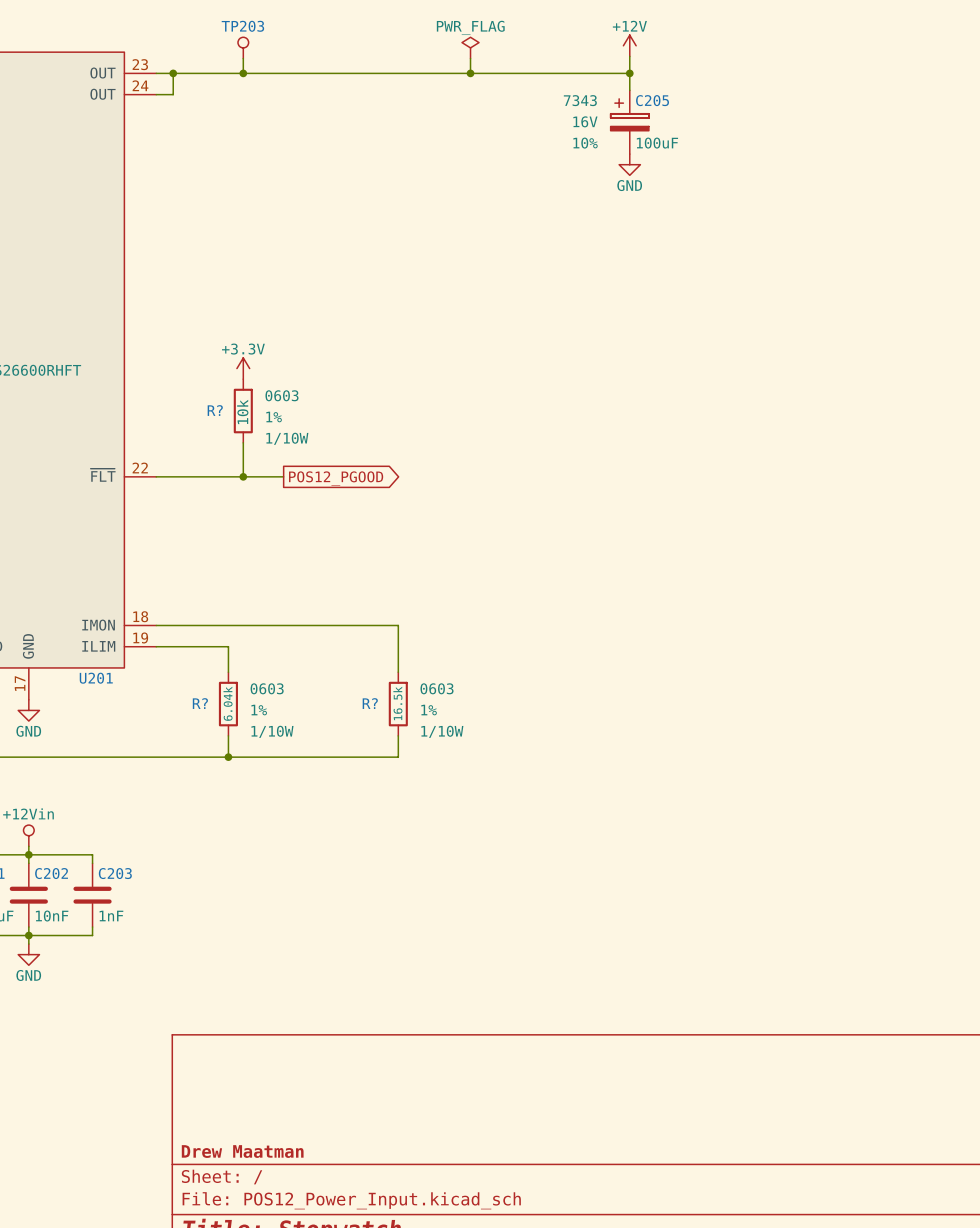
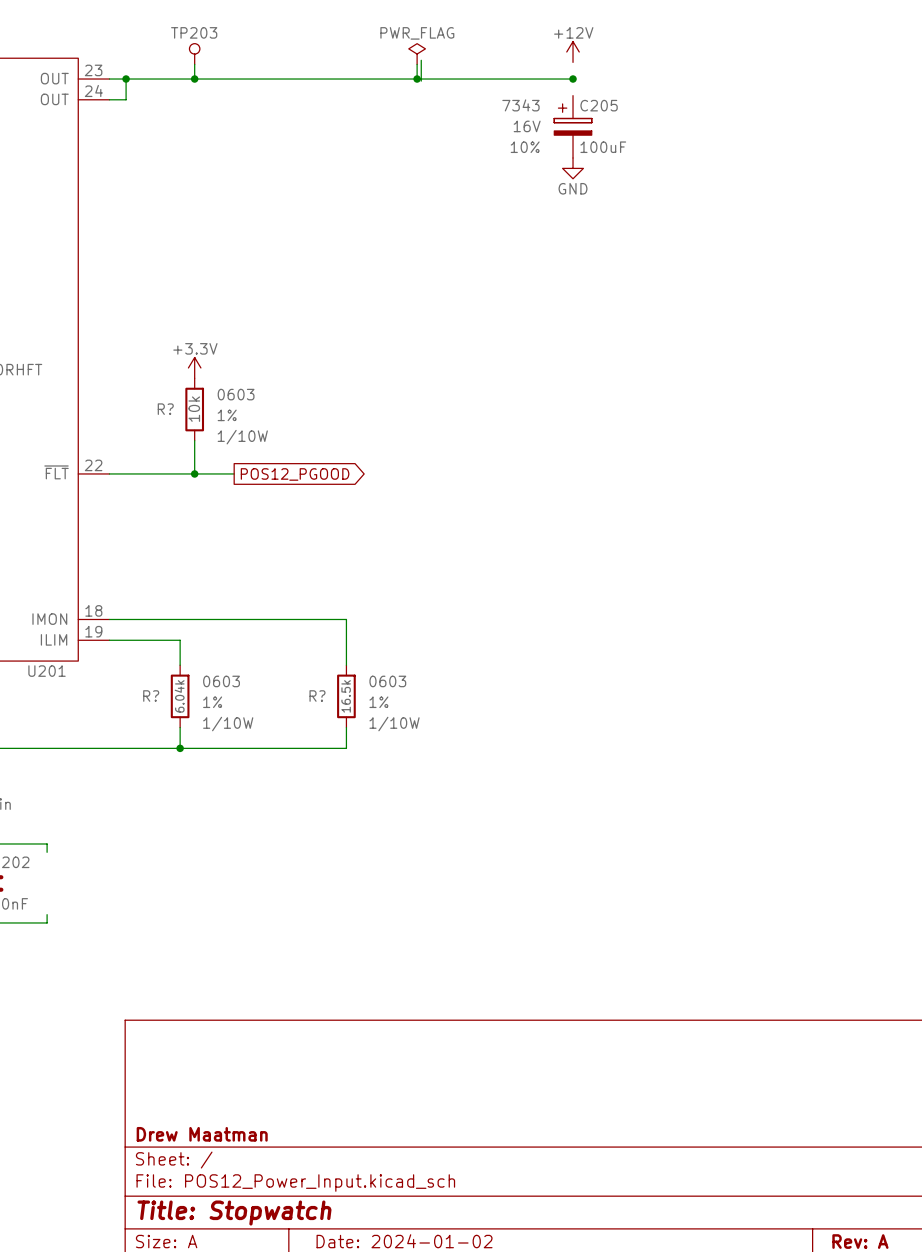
wire: none -> (421, 60) (421, 81)
wire: (629, 56) (629, 90) -> none
C203: 1nF (92, 895) -> none

